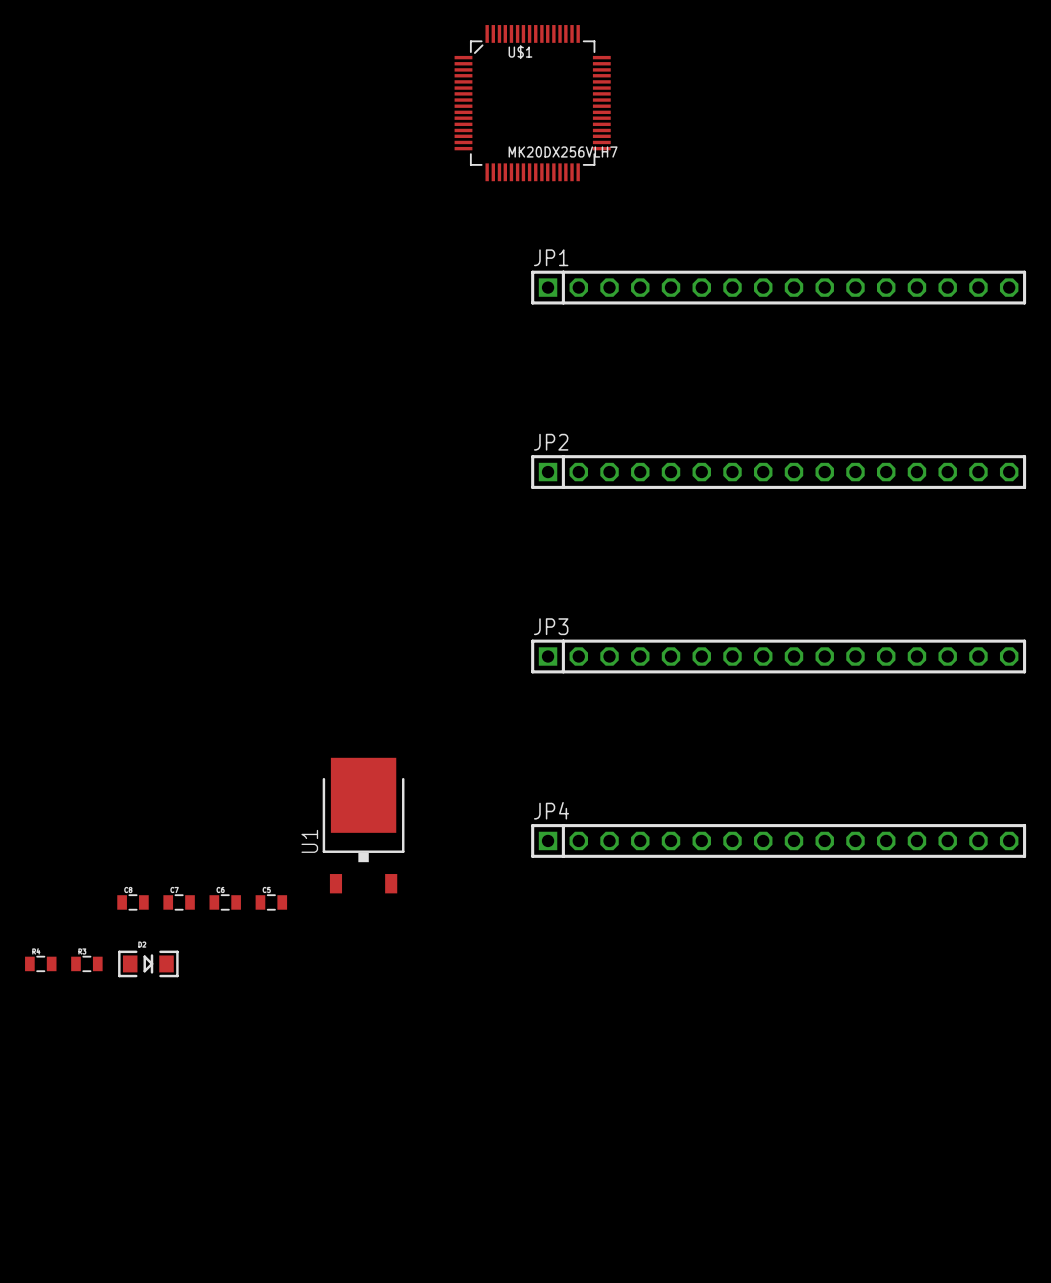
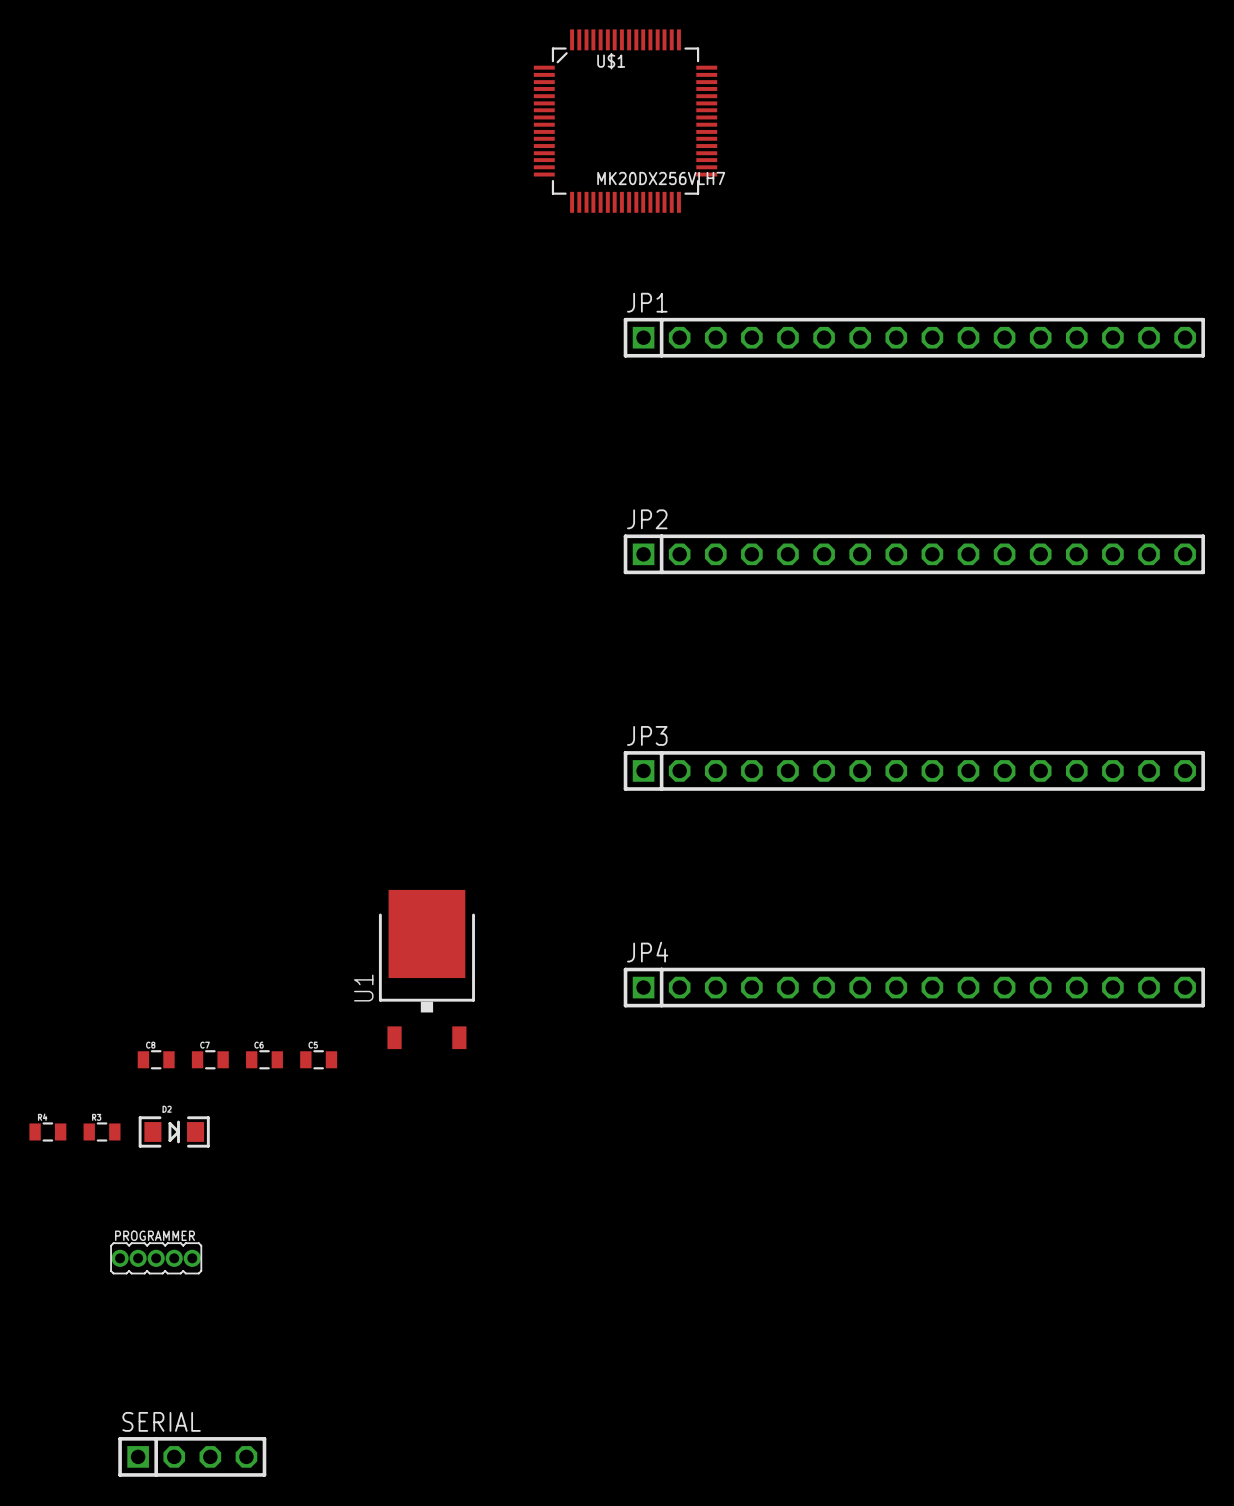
PROGRAMMER: none -> (156, 1258)
SERIAL: none -> (192, 1456)

